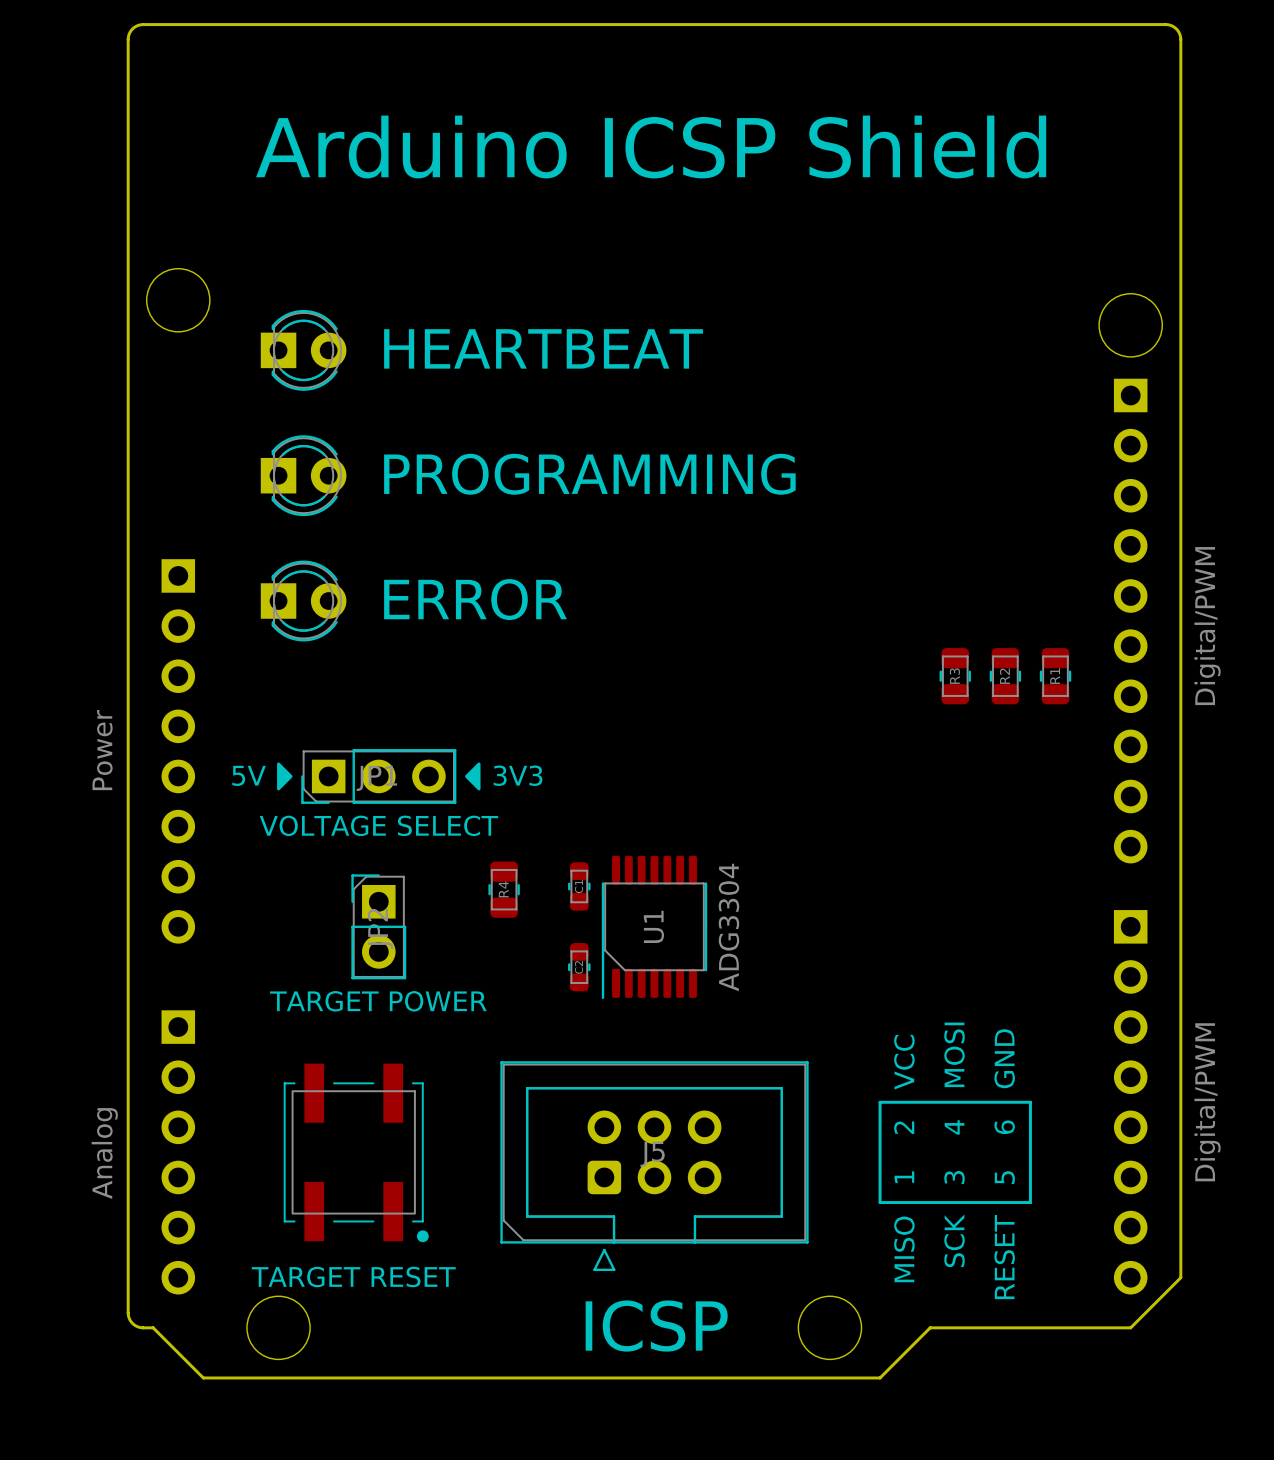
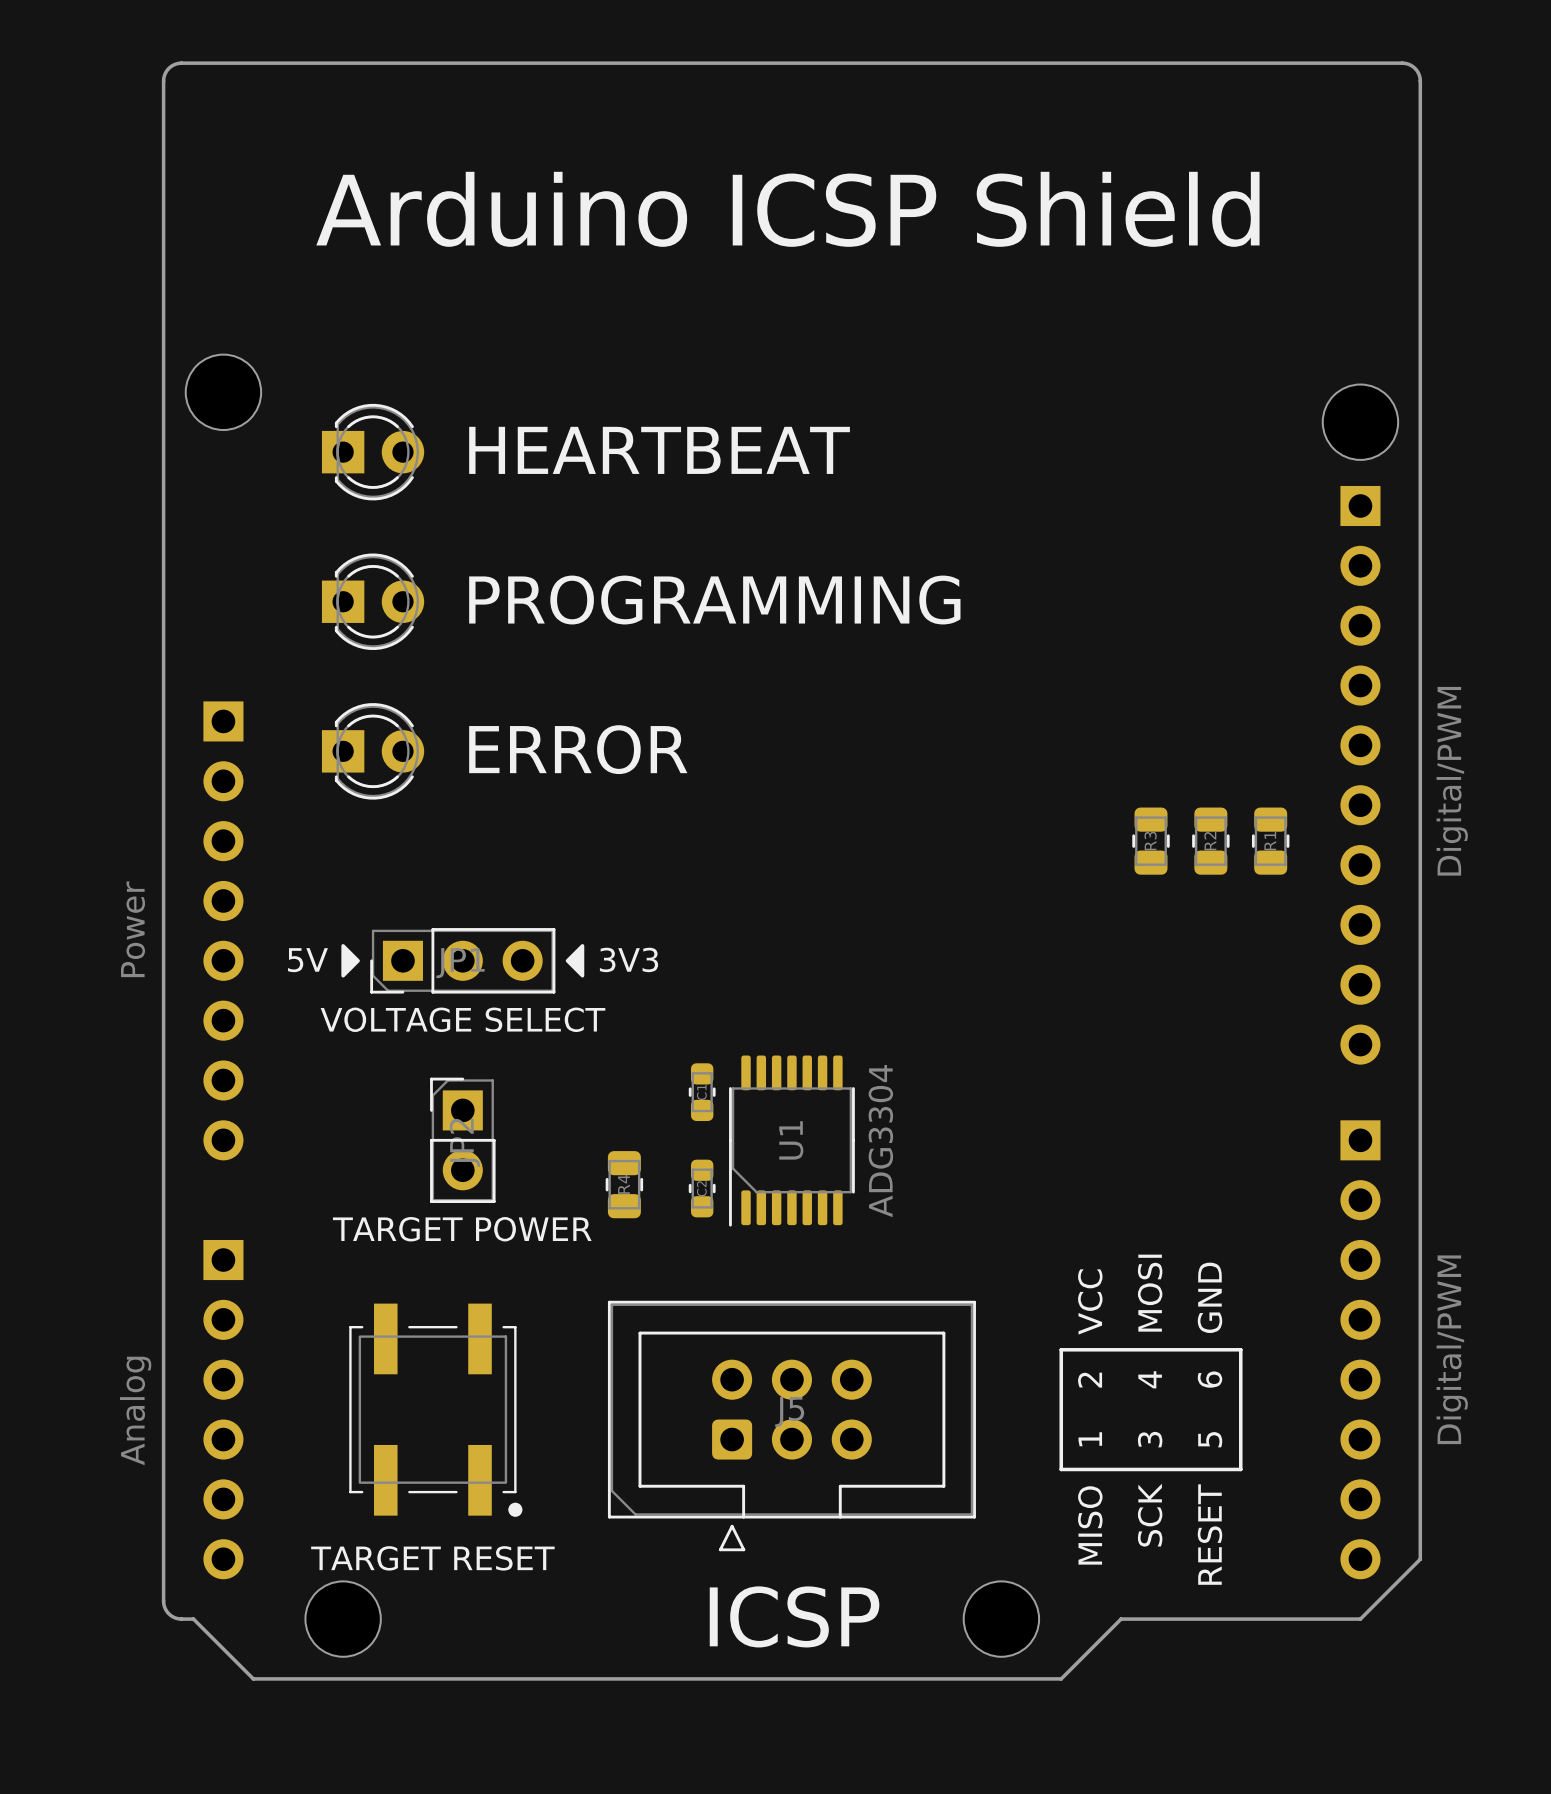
R4 position: (504, 889) -> (624, 1184)

